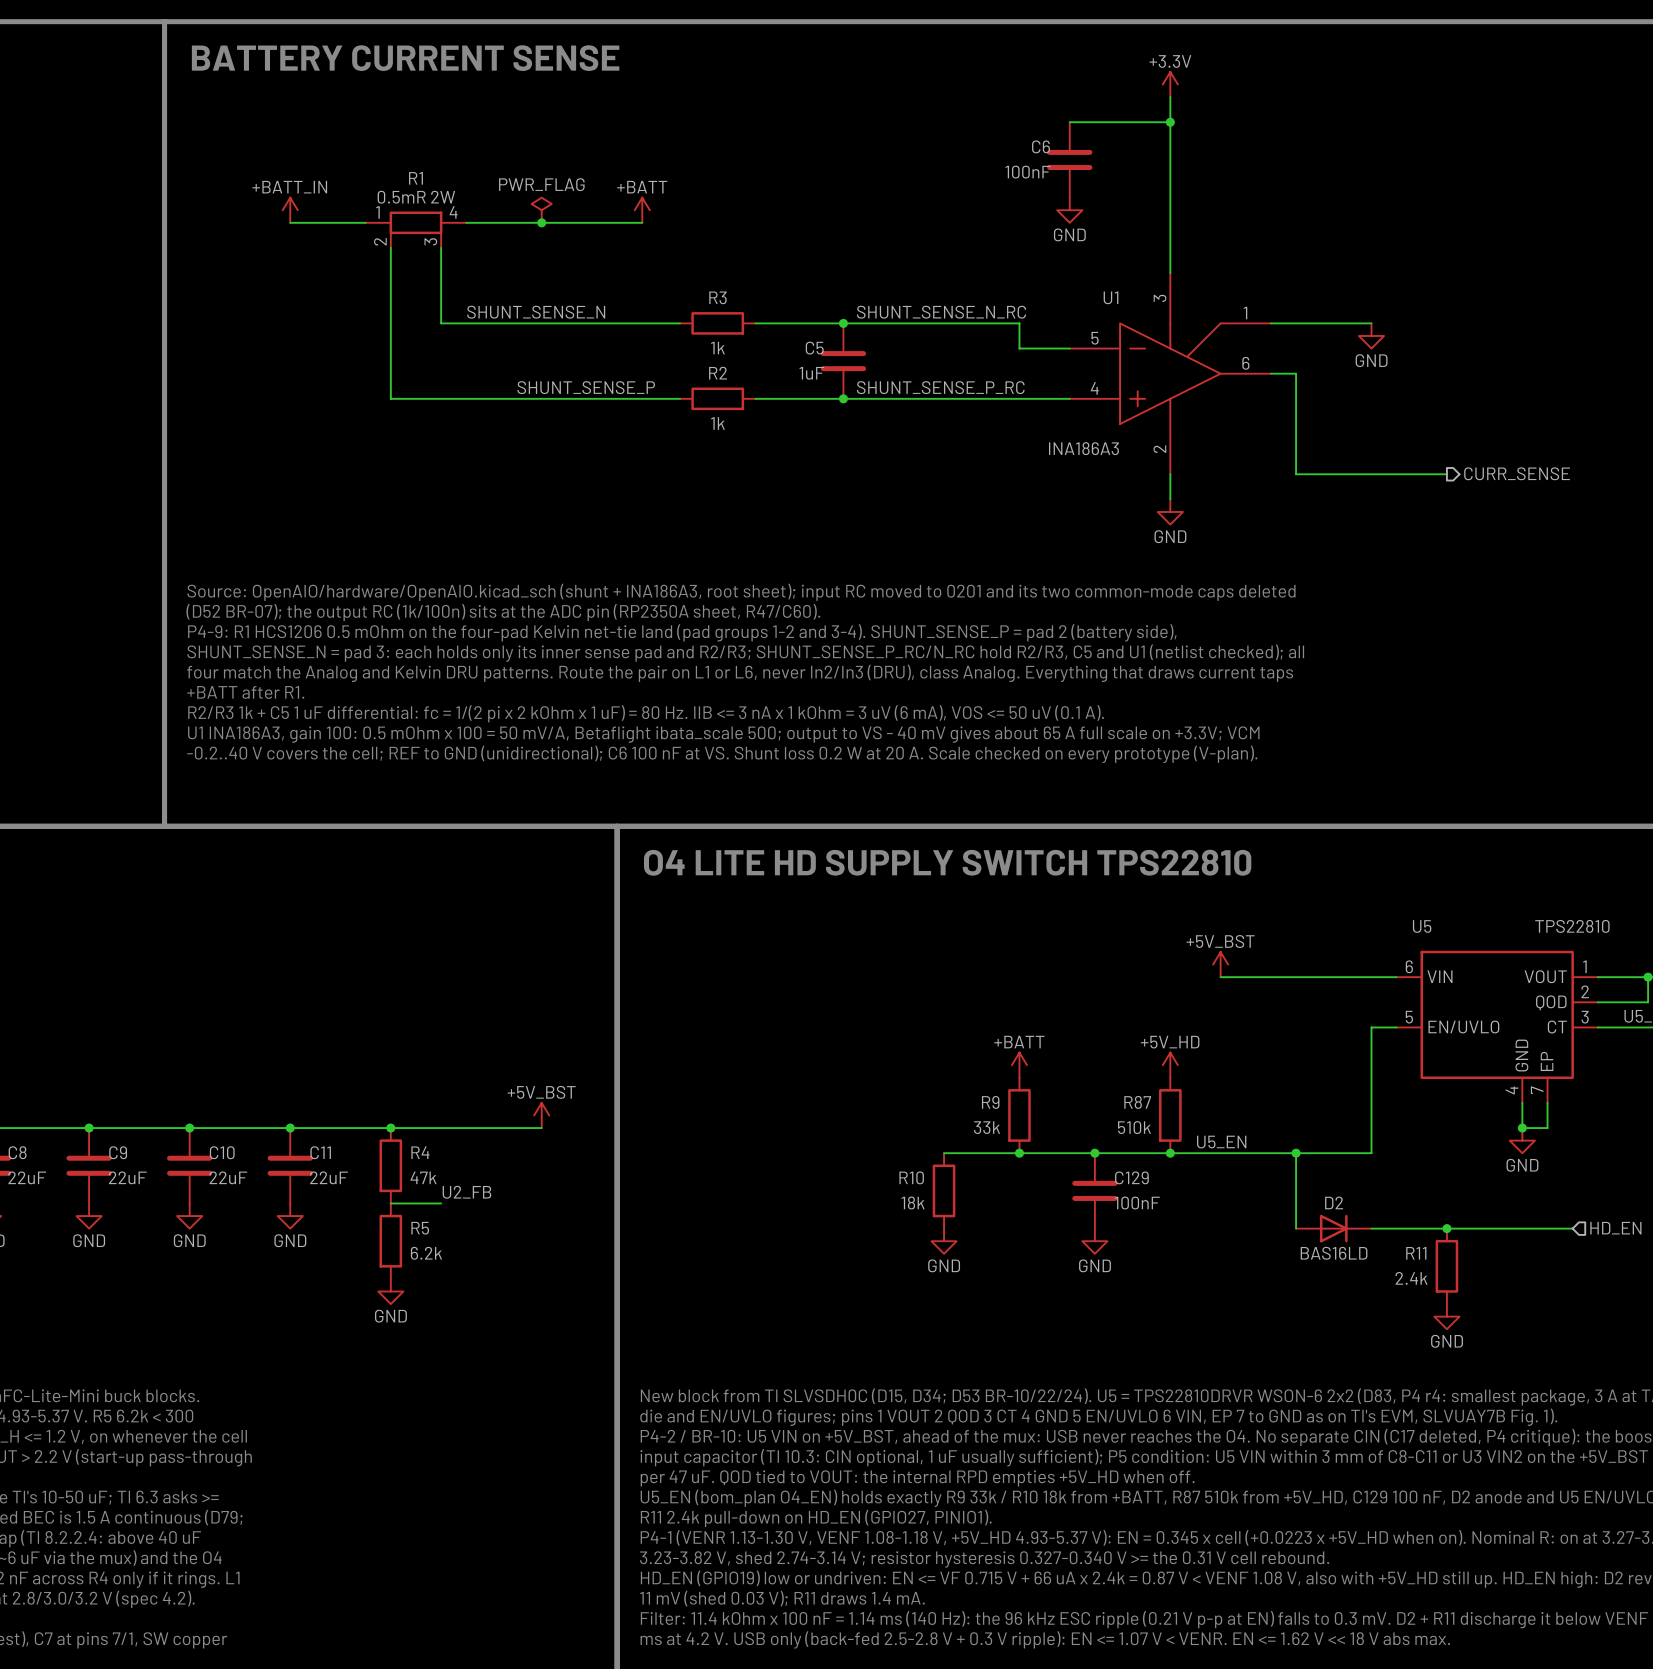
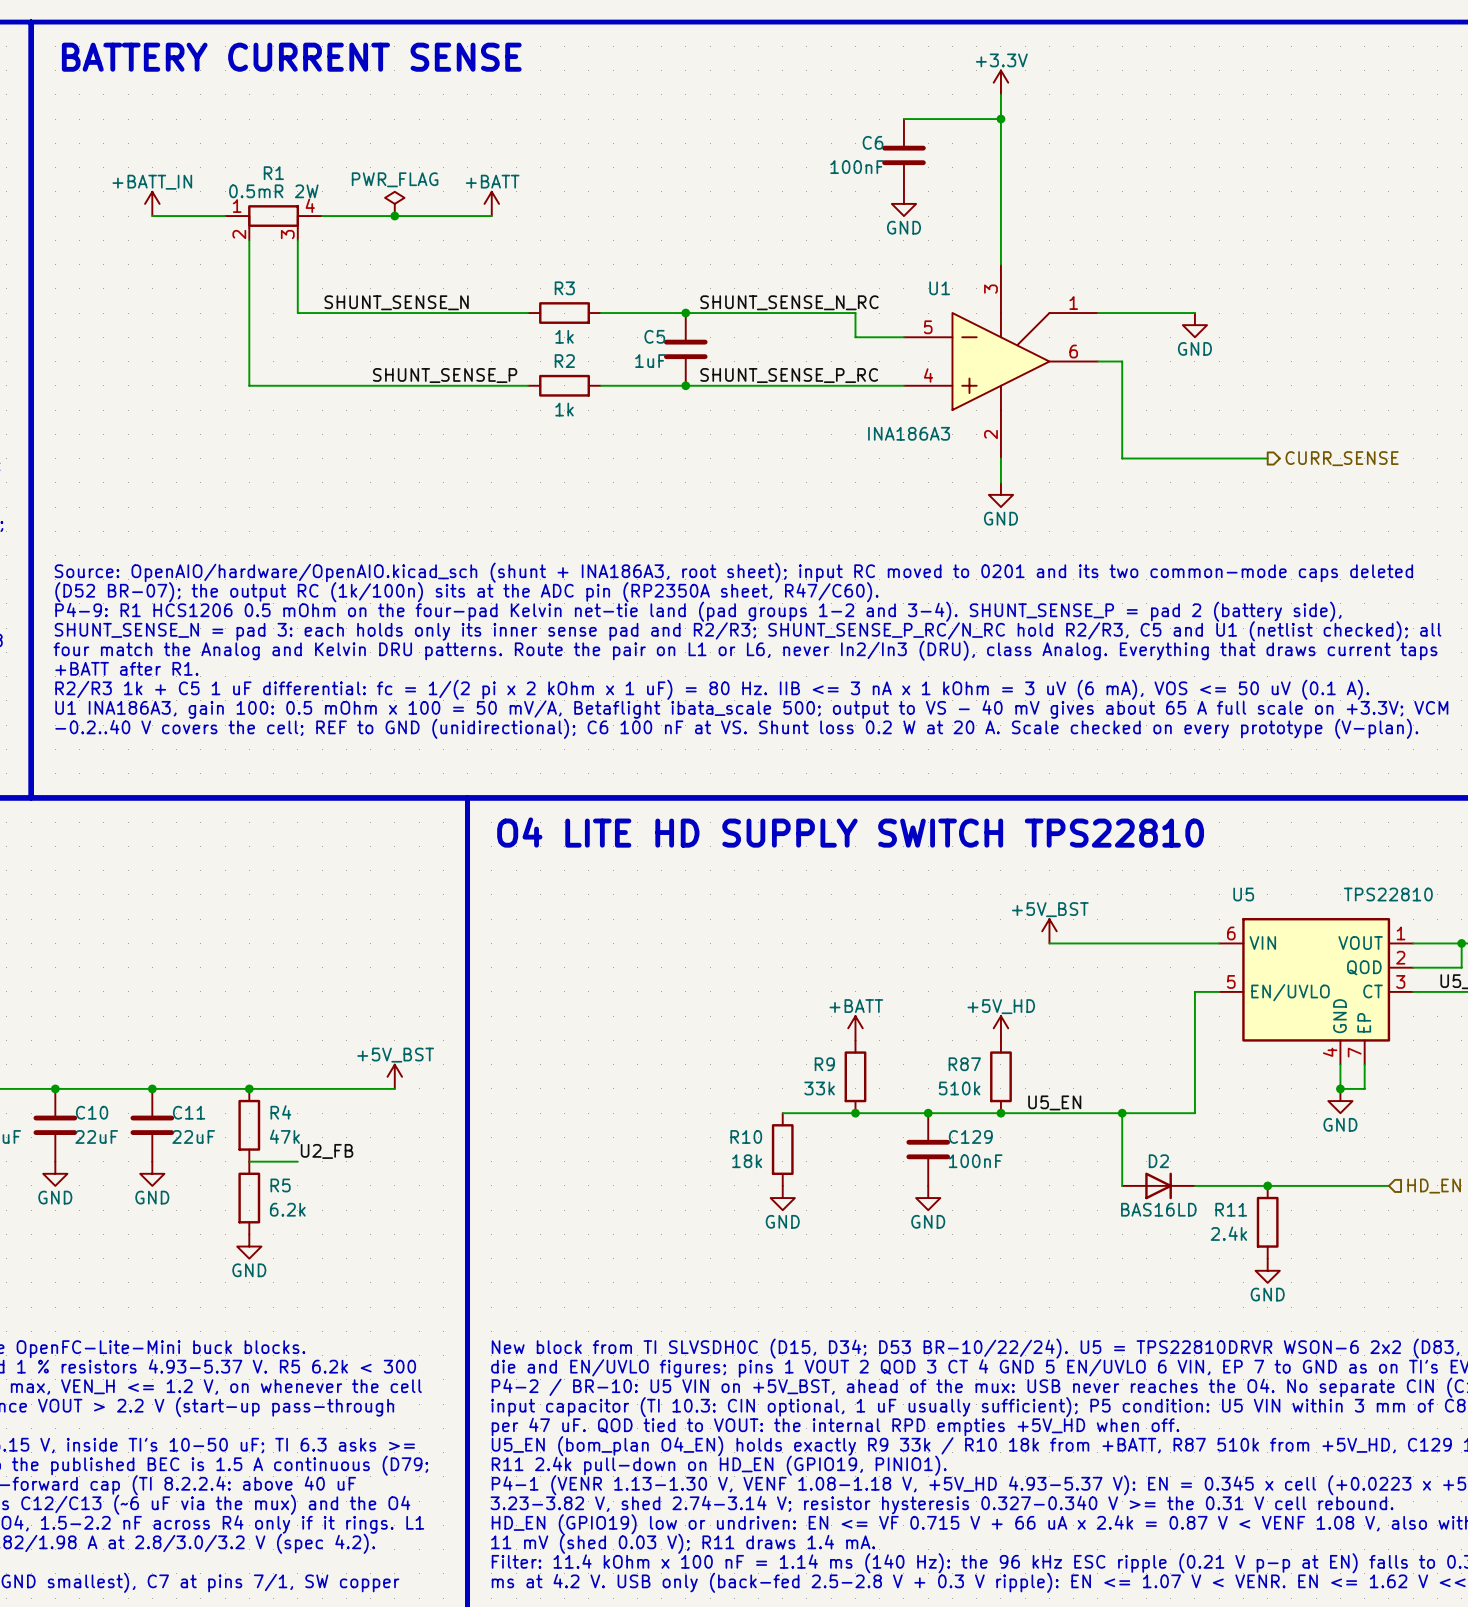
text: R11 2.4k pull-down on HD_EN (GPIO27, PINIO1). (816, 1518) -> R11 2.4k pull-down on HD_EN (GPIO19, PINIO1). (719, 1465)

